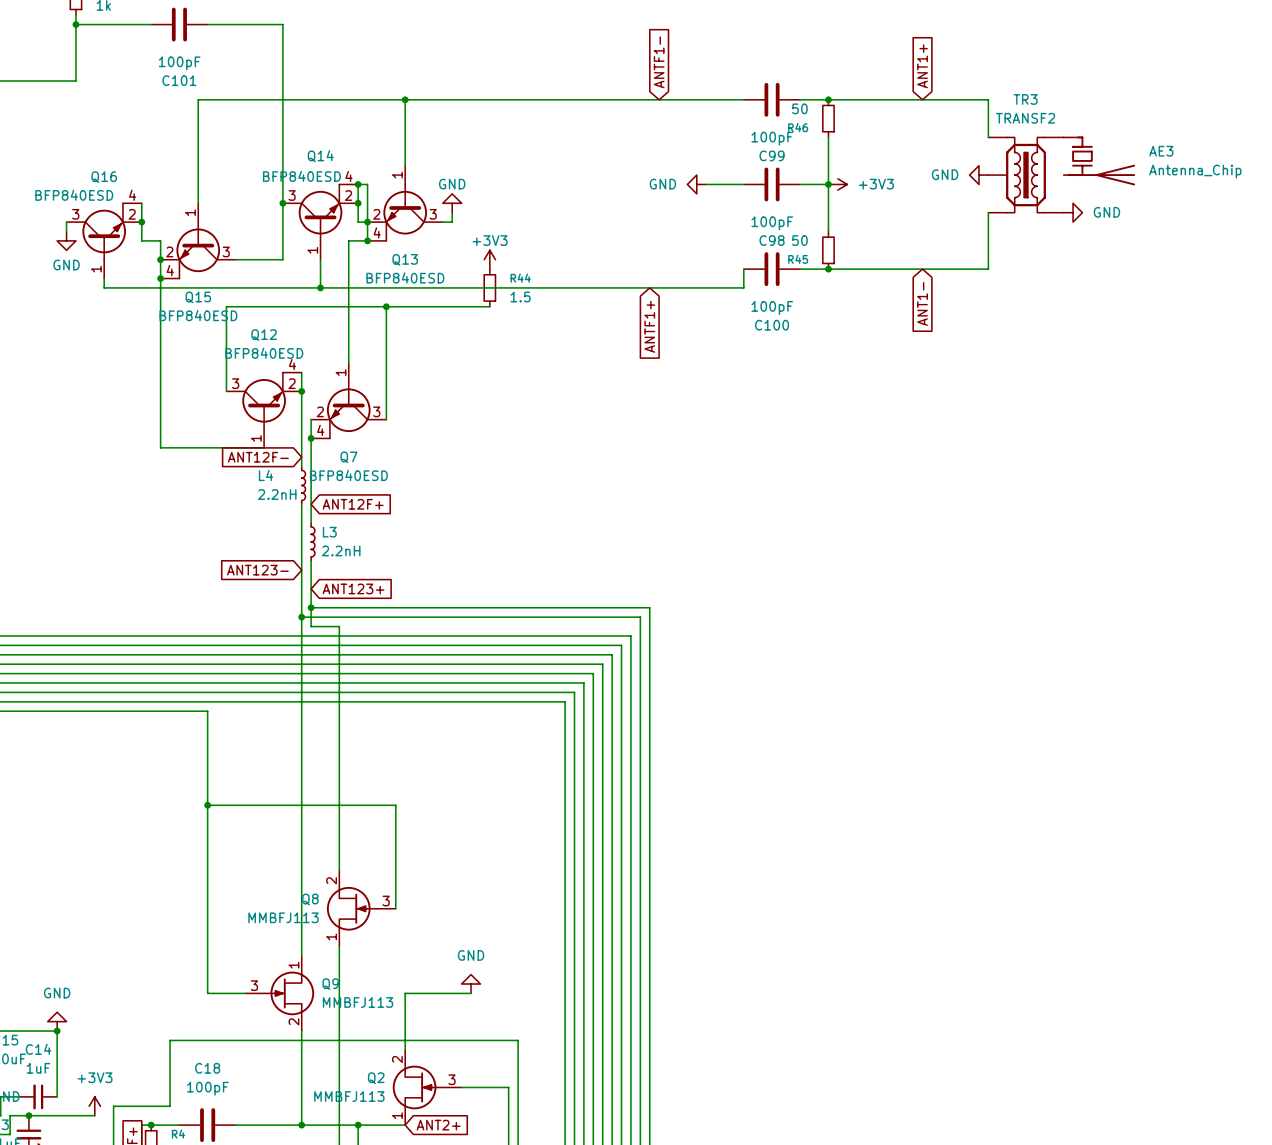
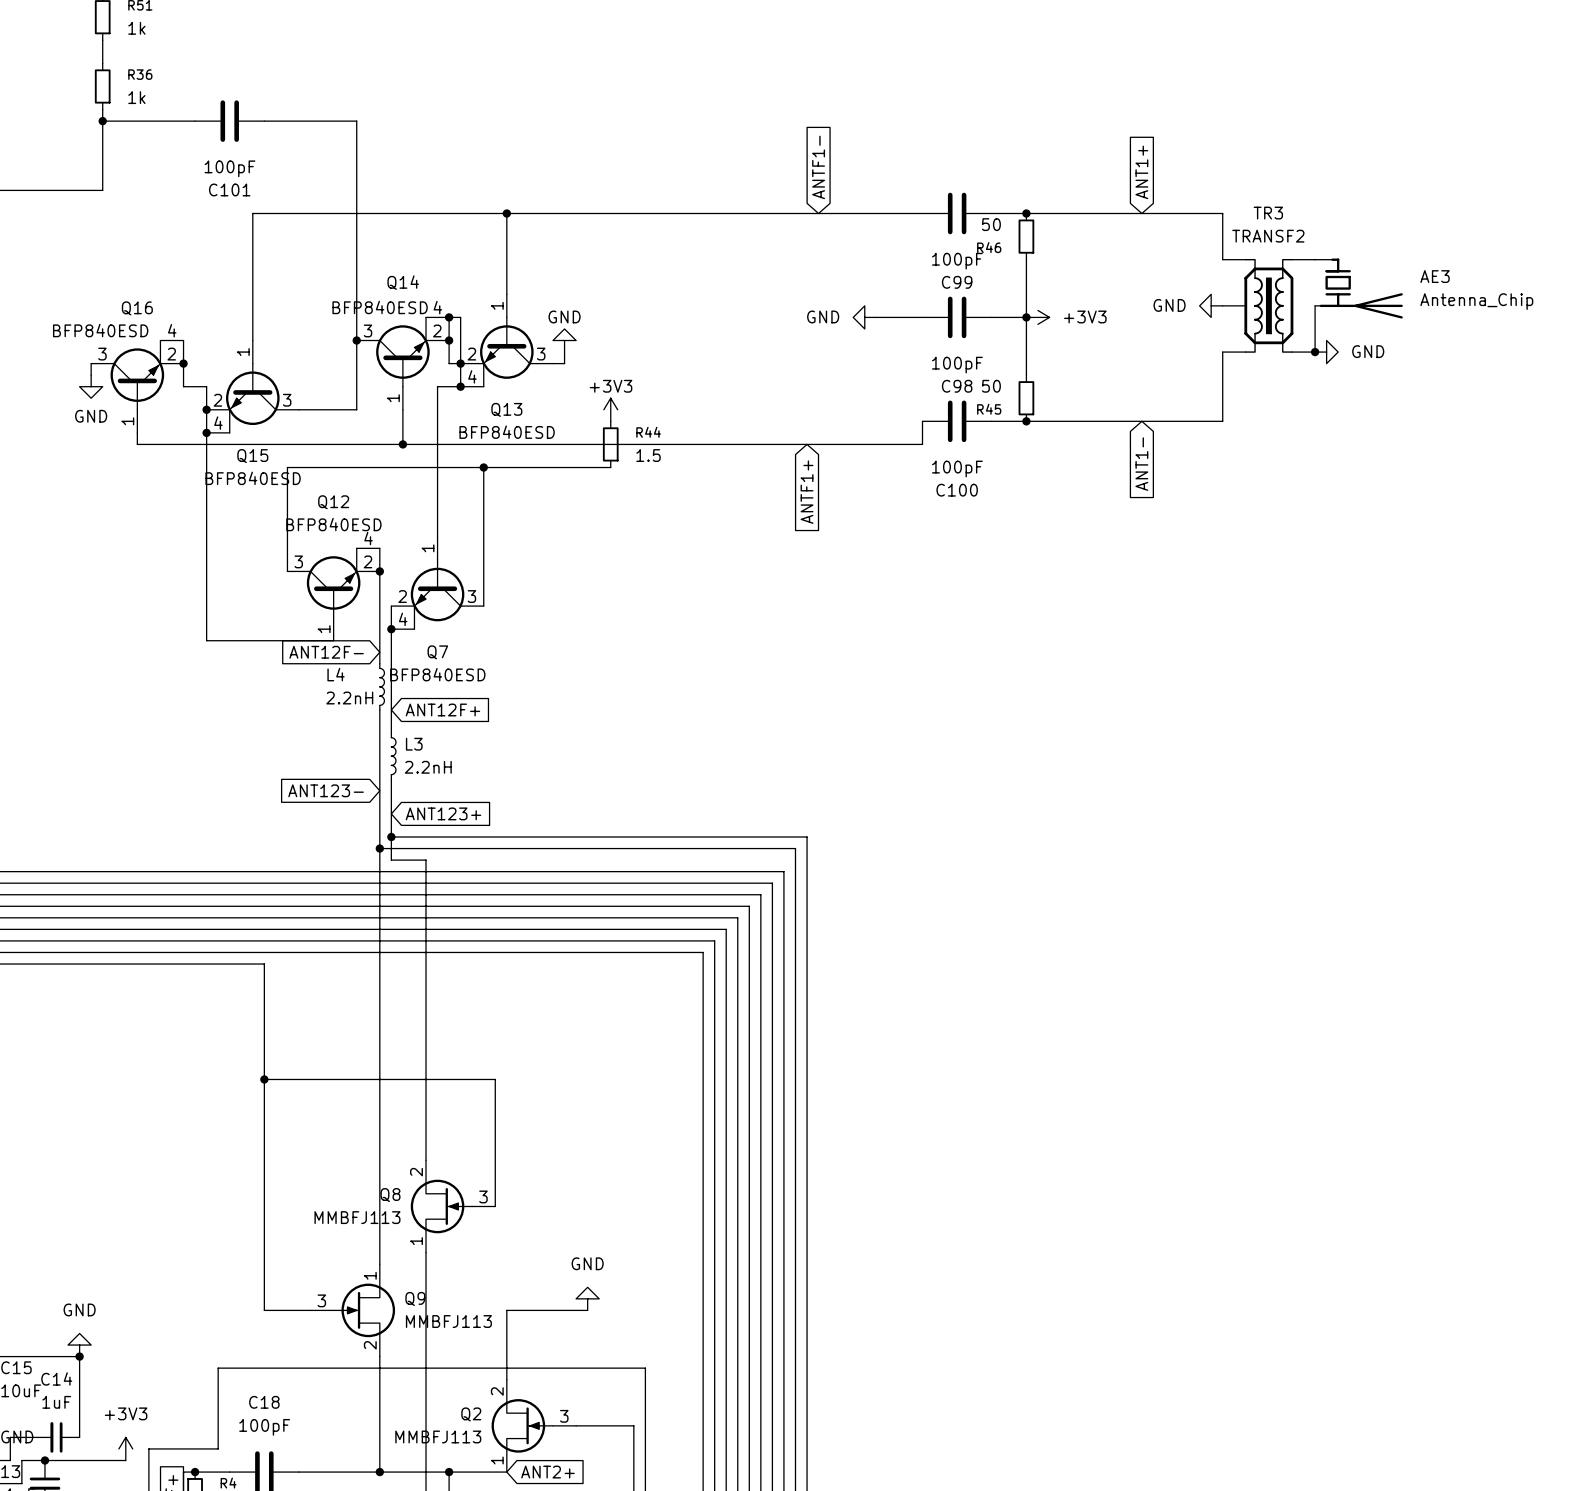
wire: none -> (1315, 305) (1315, 352)
junction: none -> (1315, 352)

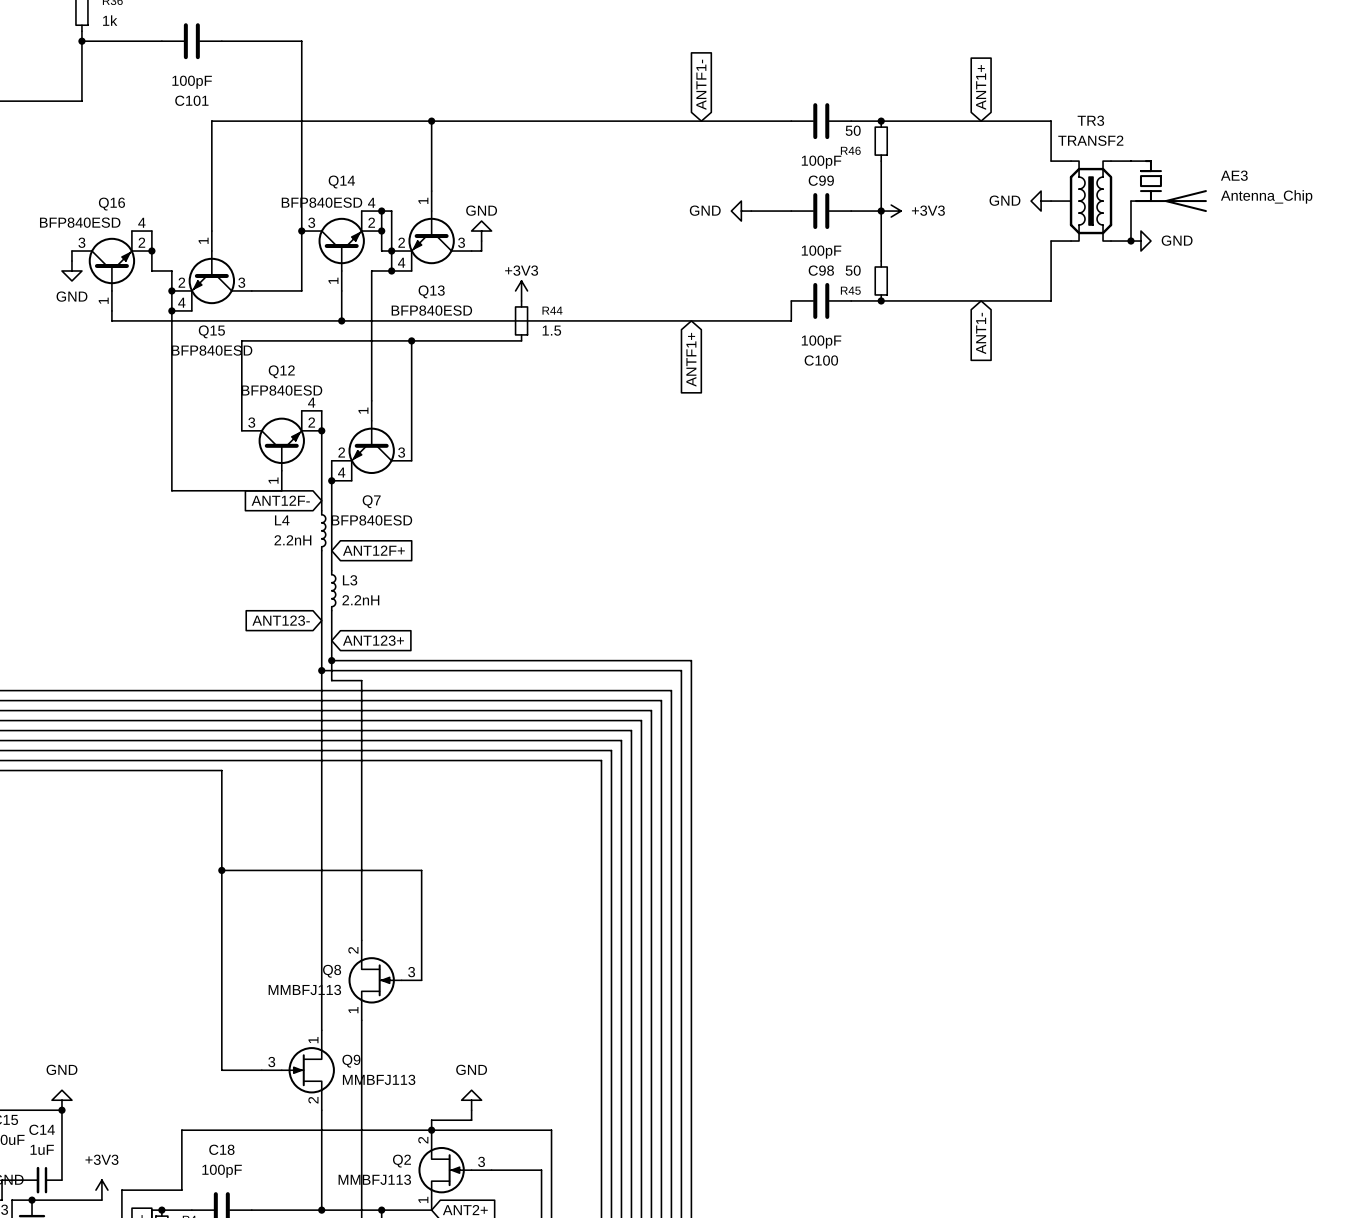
power symbol position: GND (587, 1298) -> GND (471, 1100)
wire: (587, 1310) (506, 1310) (506, 1368) (218, 1368) (218, 1379) -> (551, 1130) (181, 1130)
wire: (553, 1368) (645, 1368) (645, 1379) -> (471, 1120) (471, 1110)
junction: none -> (431, 1130)

